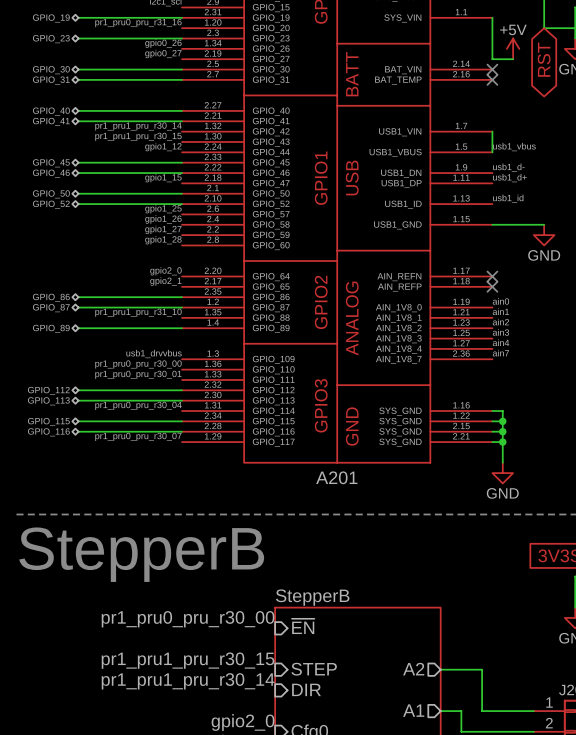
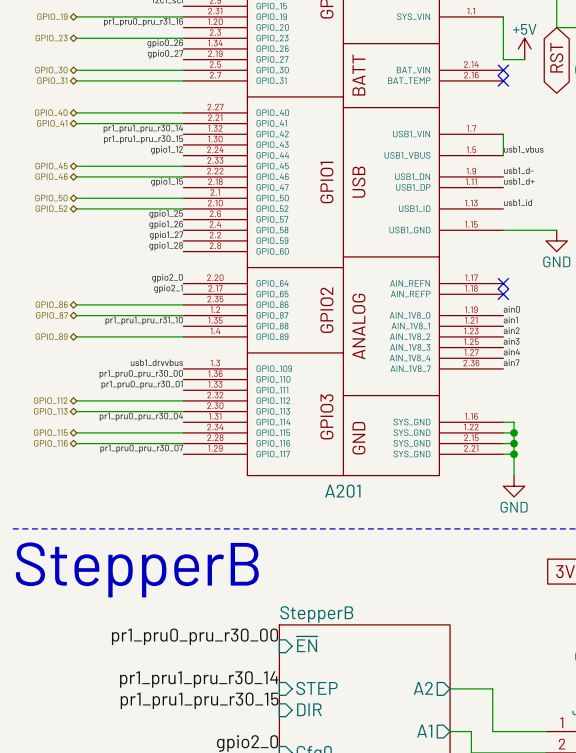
label: pr1_pru1_pru_r30_15 (188, 660) -> pr1_pru1_pru_r30_14 (199, 679)
label: pr1_pru1_pru_r30_14 (188, 681) -> pr1_pru1_pru_r30_15 (199, 700)

